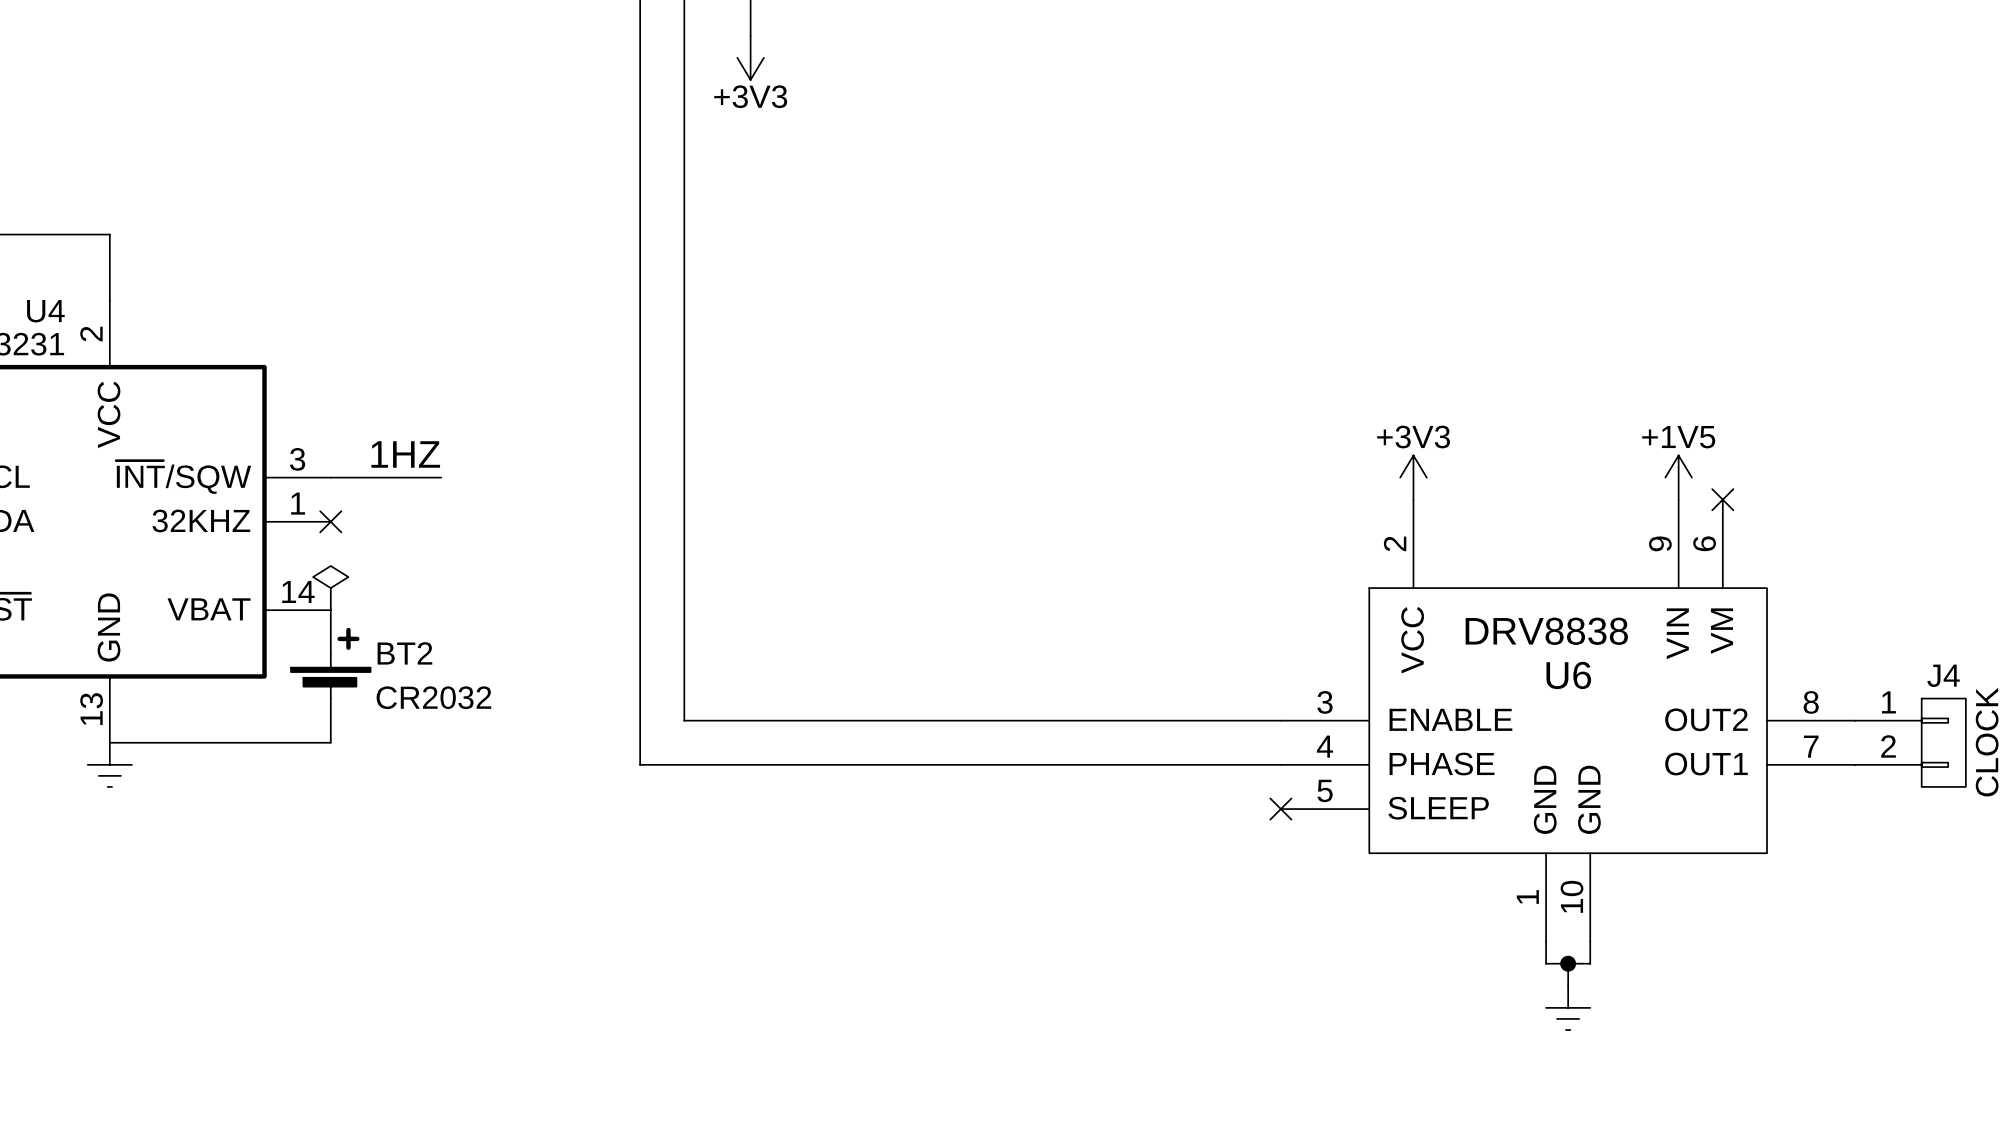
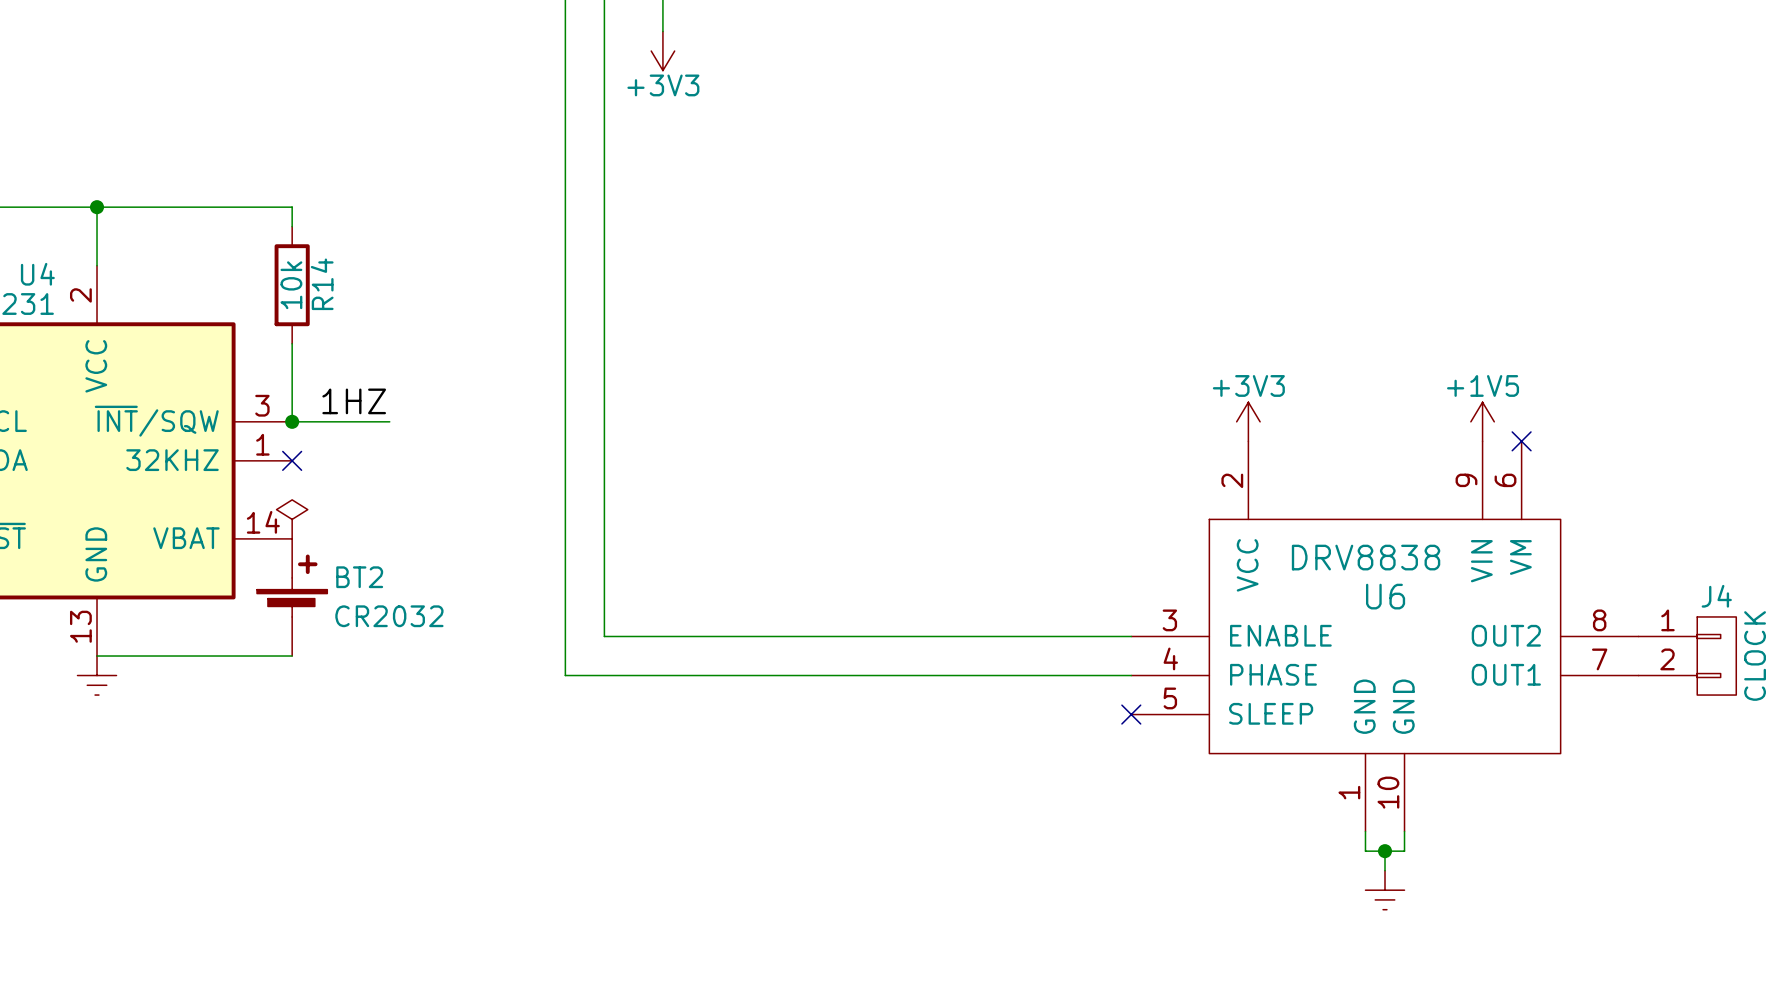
wire: none -> (97, 207) (292, 207) (292, 226)
junction: none -> (97, 207)
R14: none -> 10k (292, 285)
wire: none -> (292, 343) (292, 421)
junction: none -> (292, 421)

